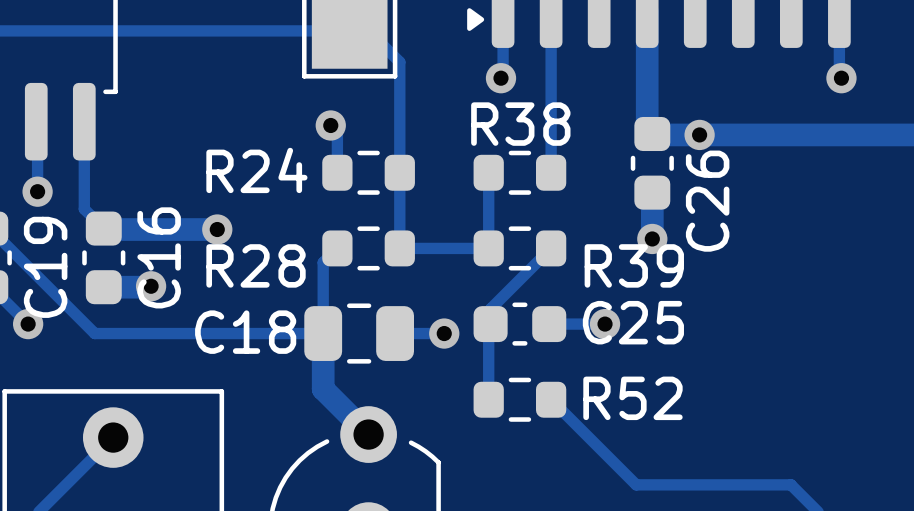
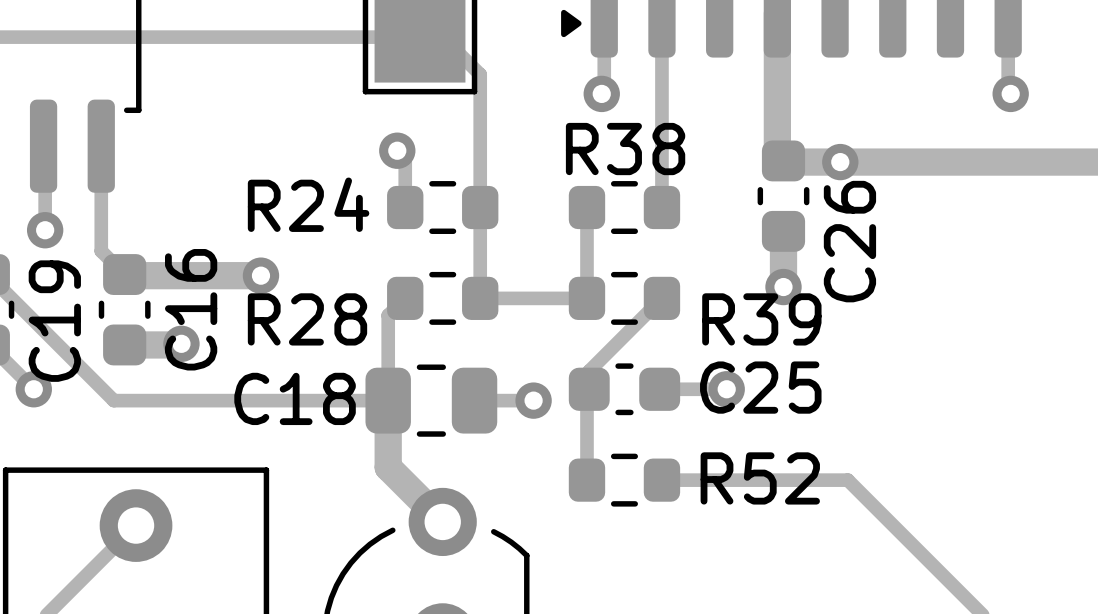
track: (551, 399) (636, 484) (791, 484) -> (661, 480) (847, 480) (950, 582)

